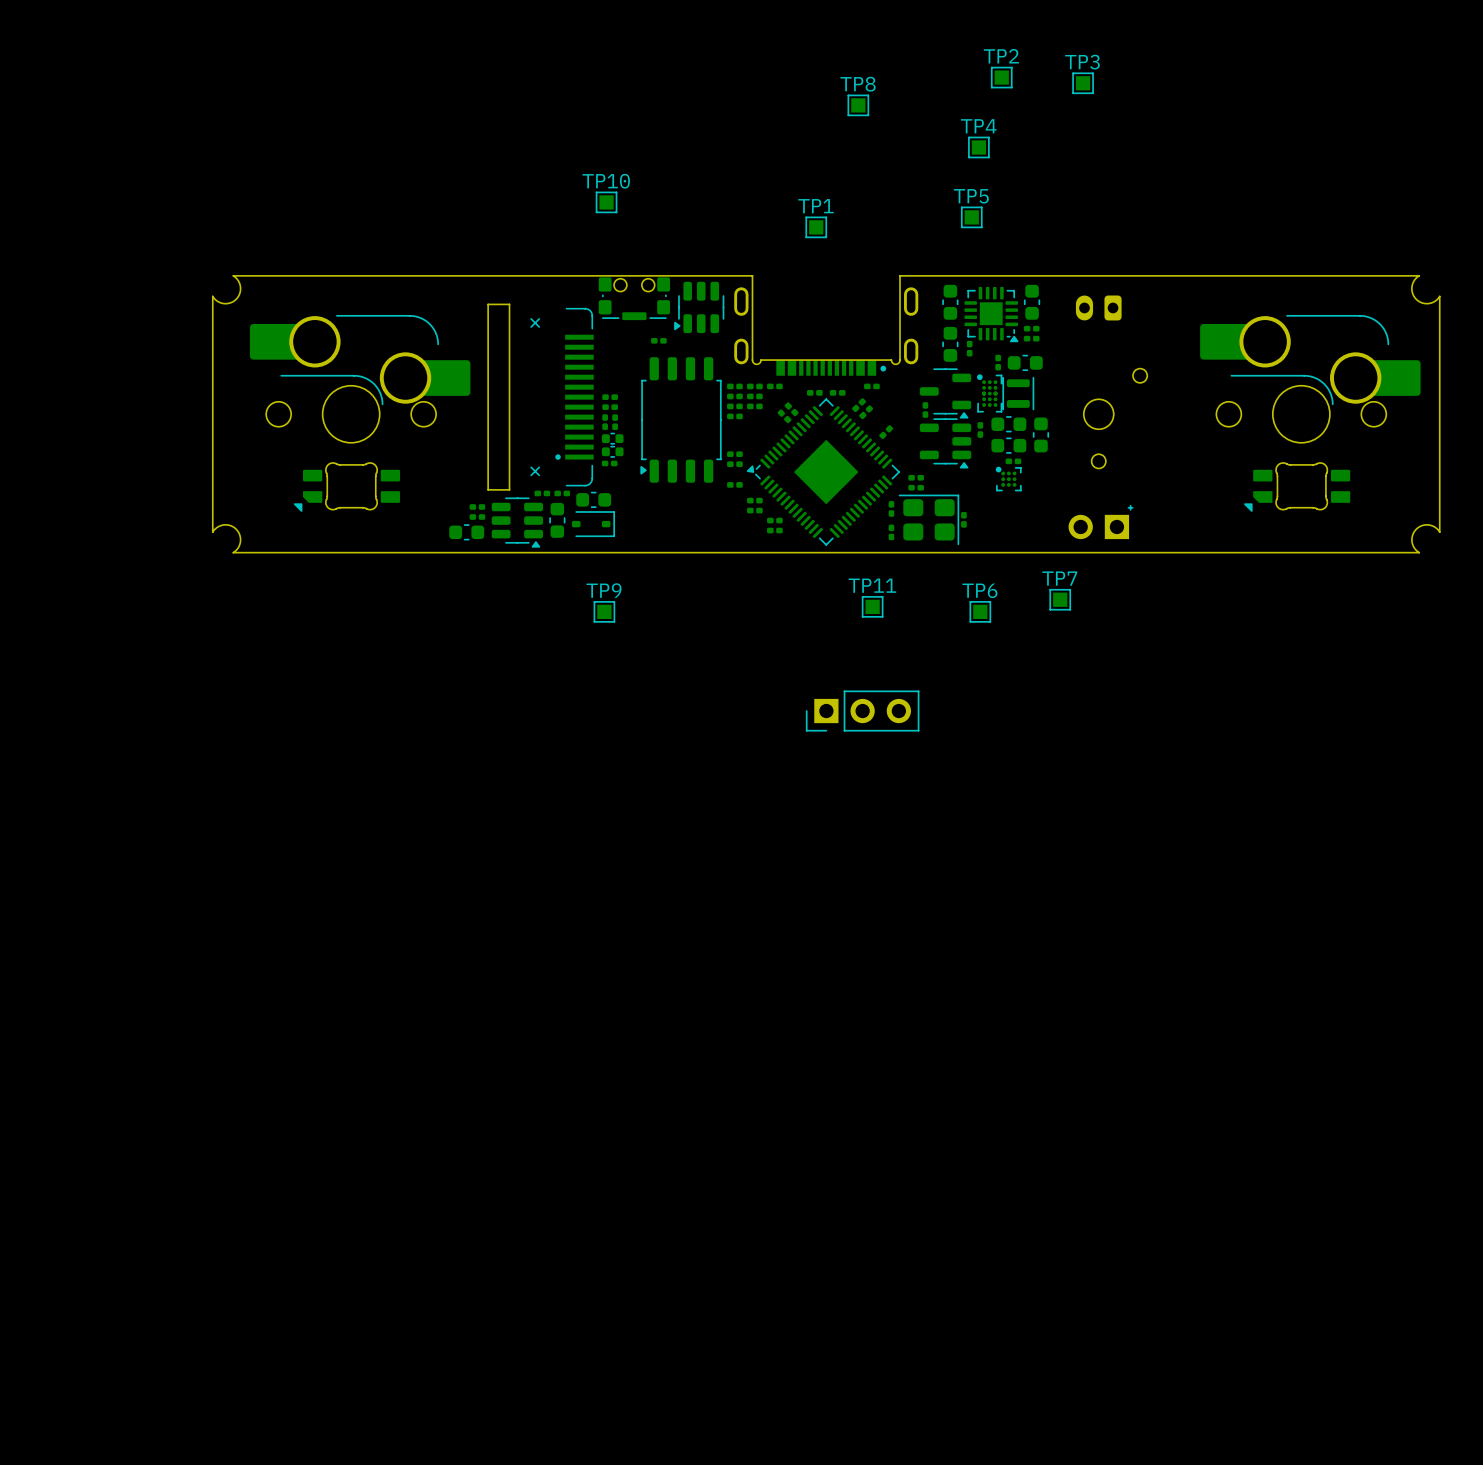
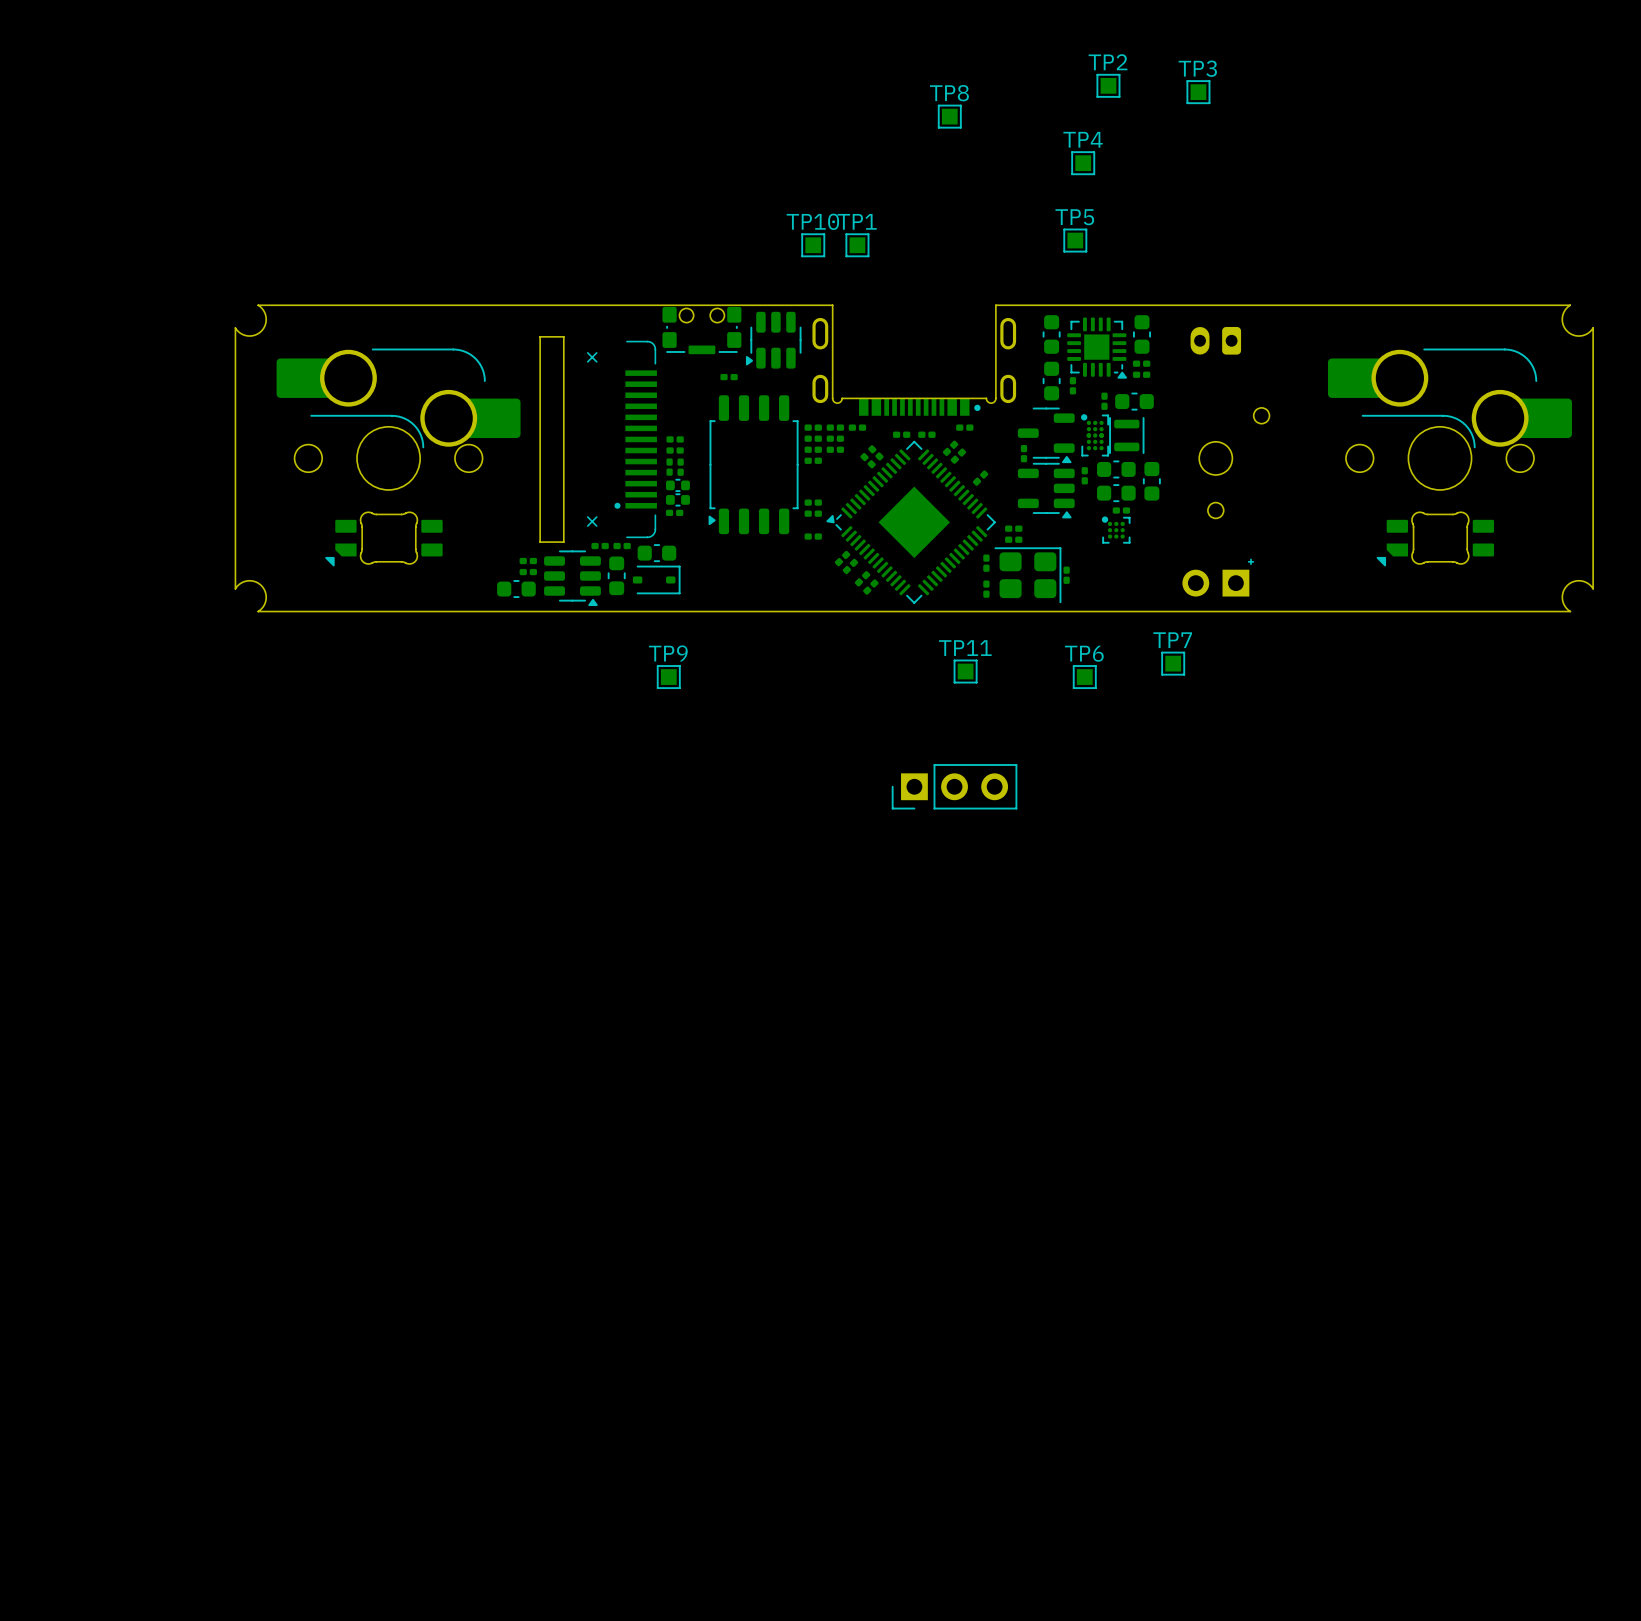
TP10 position: (606, 202) -> (813, 245)
TP1 position: (816, 227) -> (857, 245)
part: (754, 500) -> none
part: none -> (842, 558)
part: (754, 510) -> none
part: none -> (850, 566)
part: (774, 520) -> none
part: none -> (862, 578)
part: (774, 530) -> none
part: none -> (870, 587)

